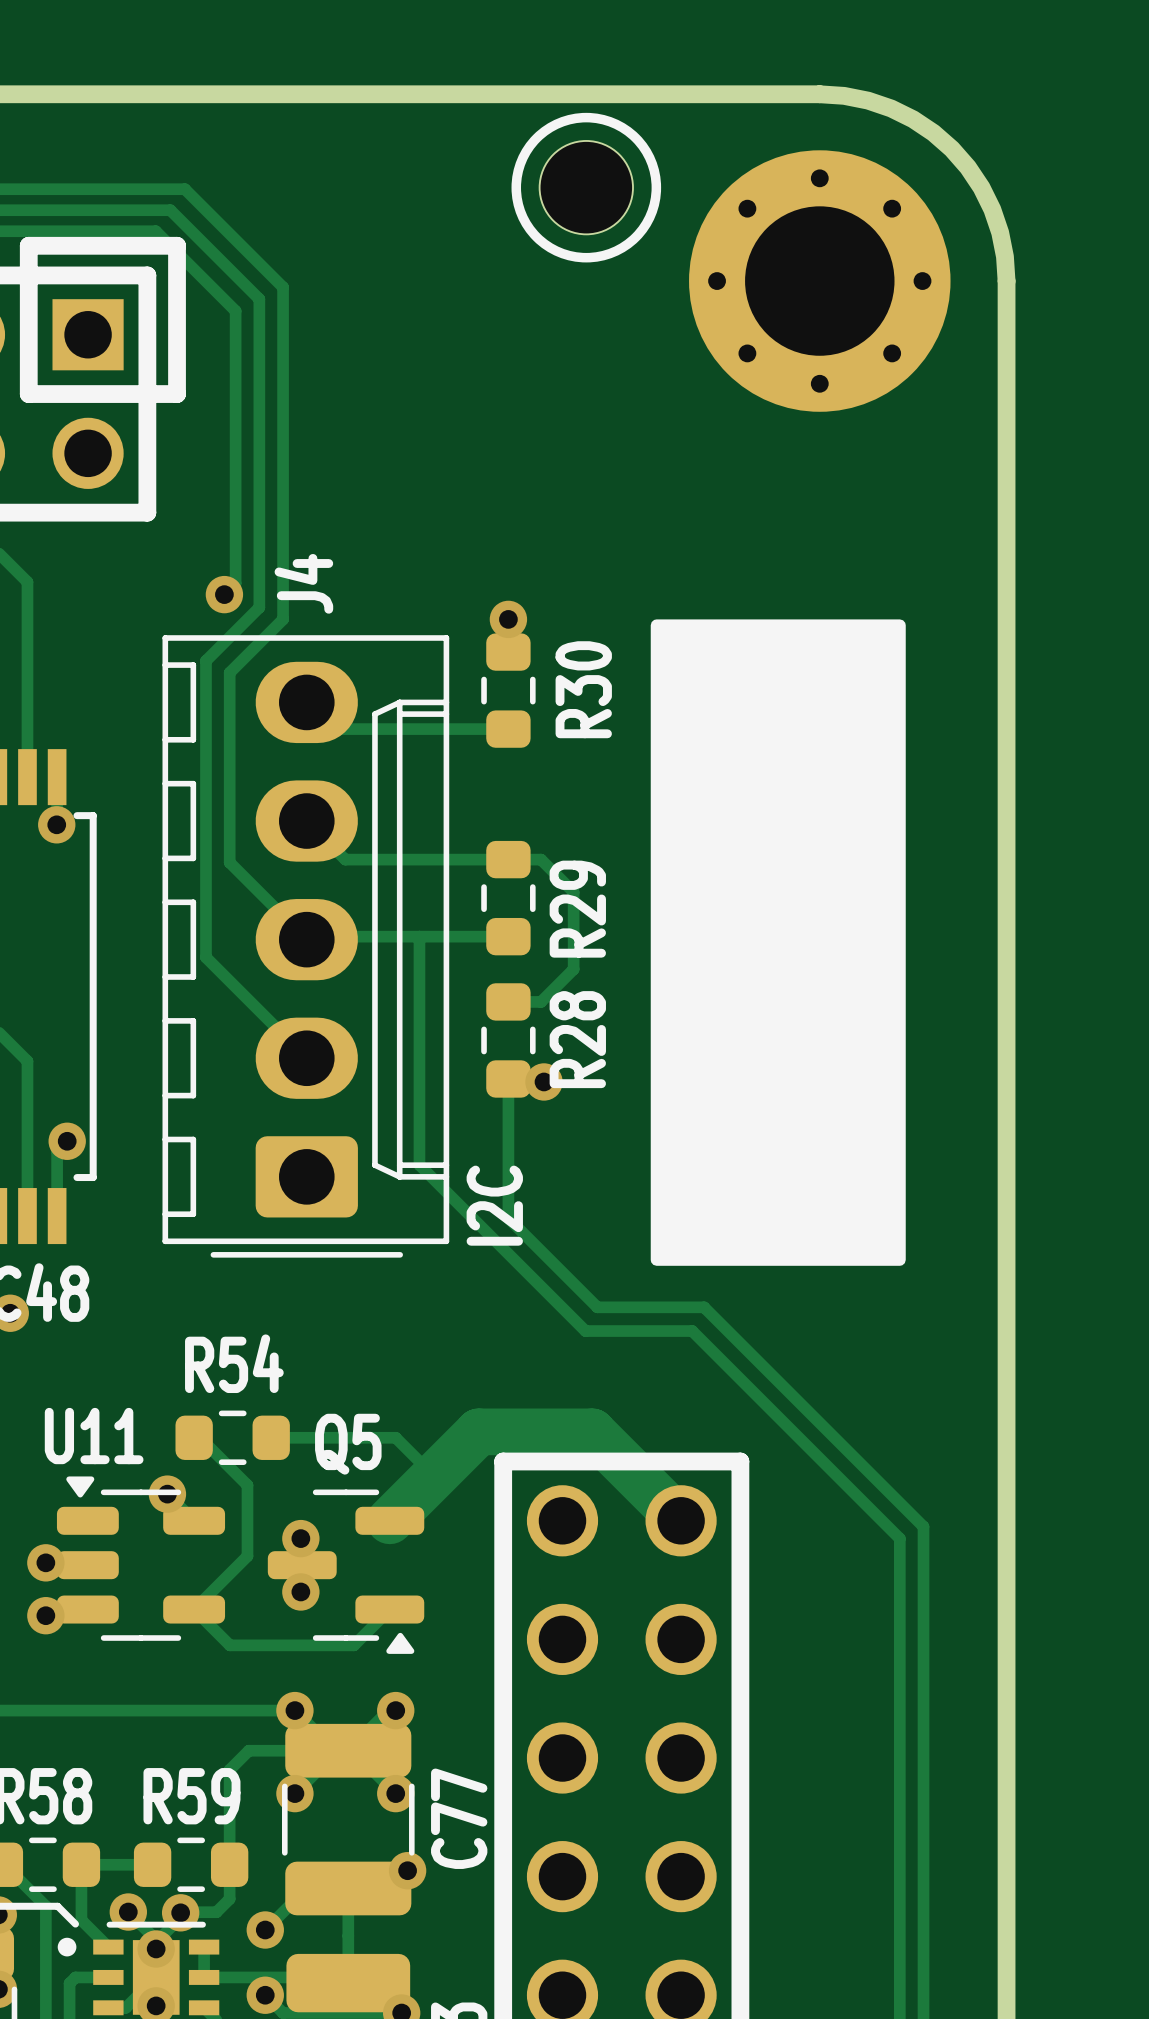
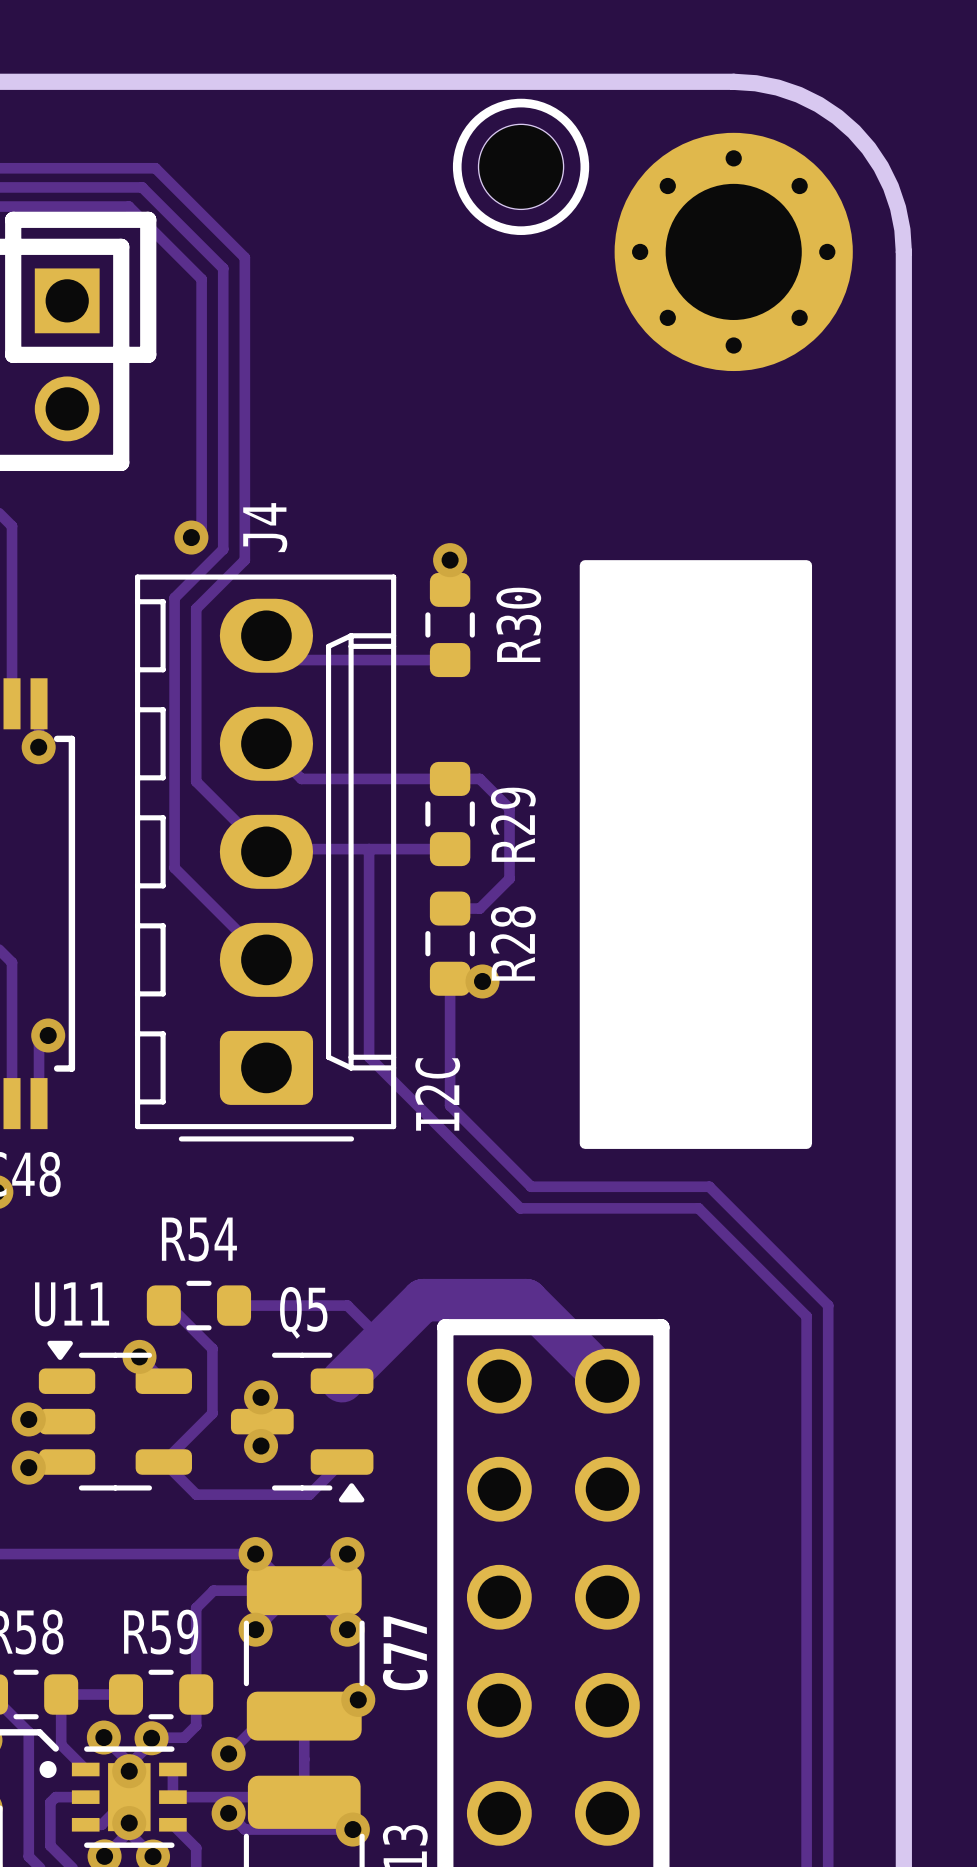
track: (704, 1307) (923, 1526) -> (628, 1186) (709, 1186) (828, 1305) (828, 1386)
track: (692, 1331) (899, 1538) -> (617, 1208) (698, 1208) (806, 1316) (806, 1397)

